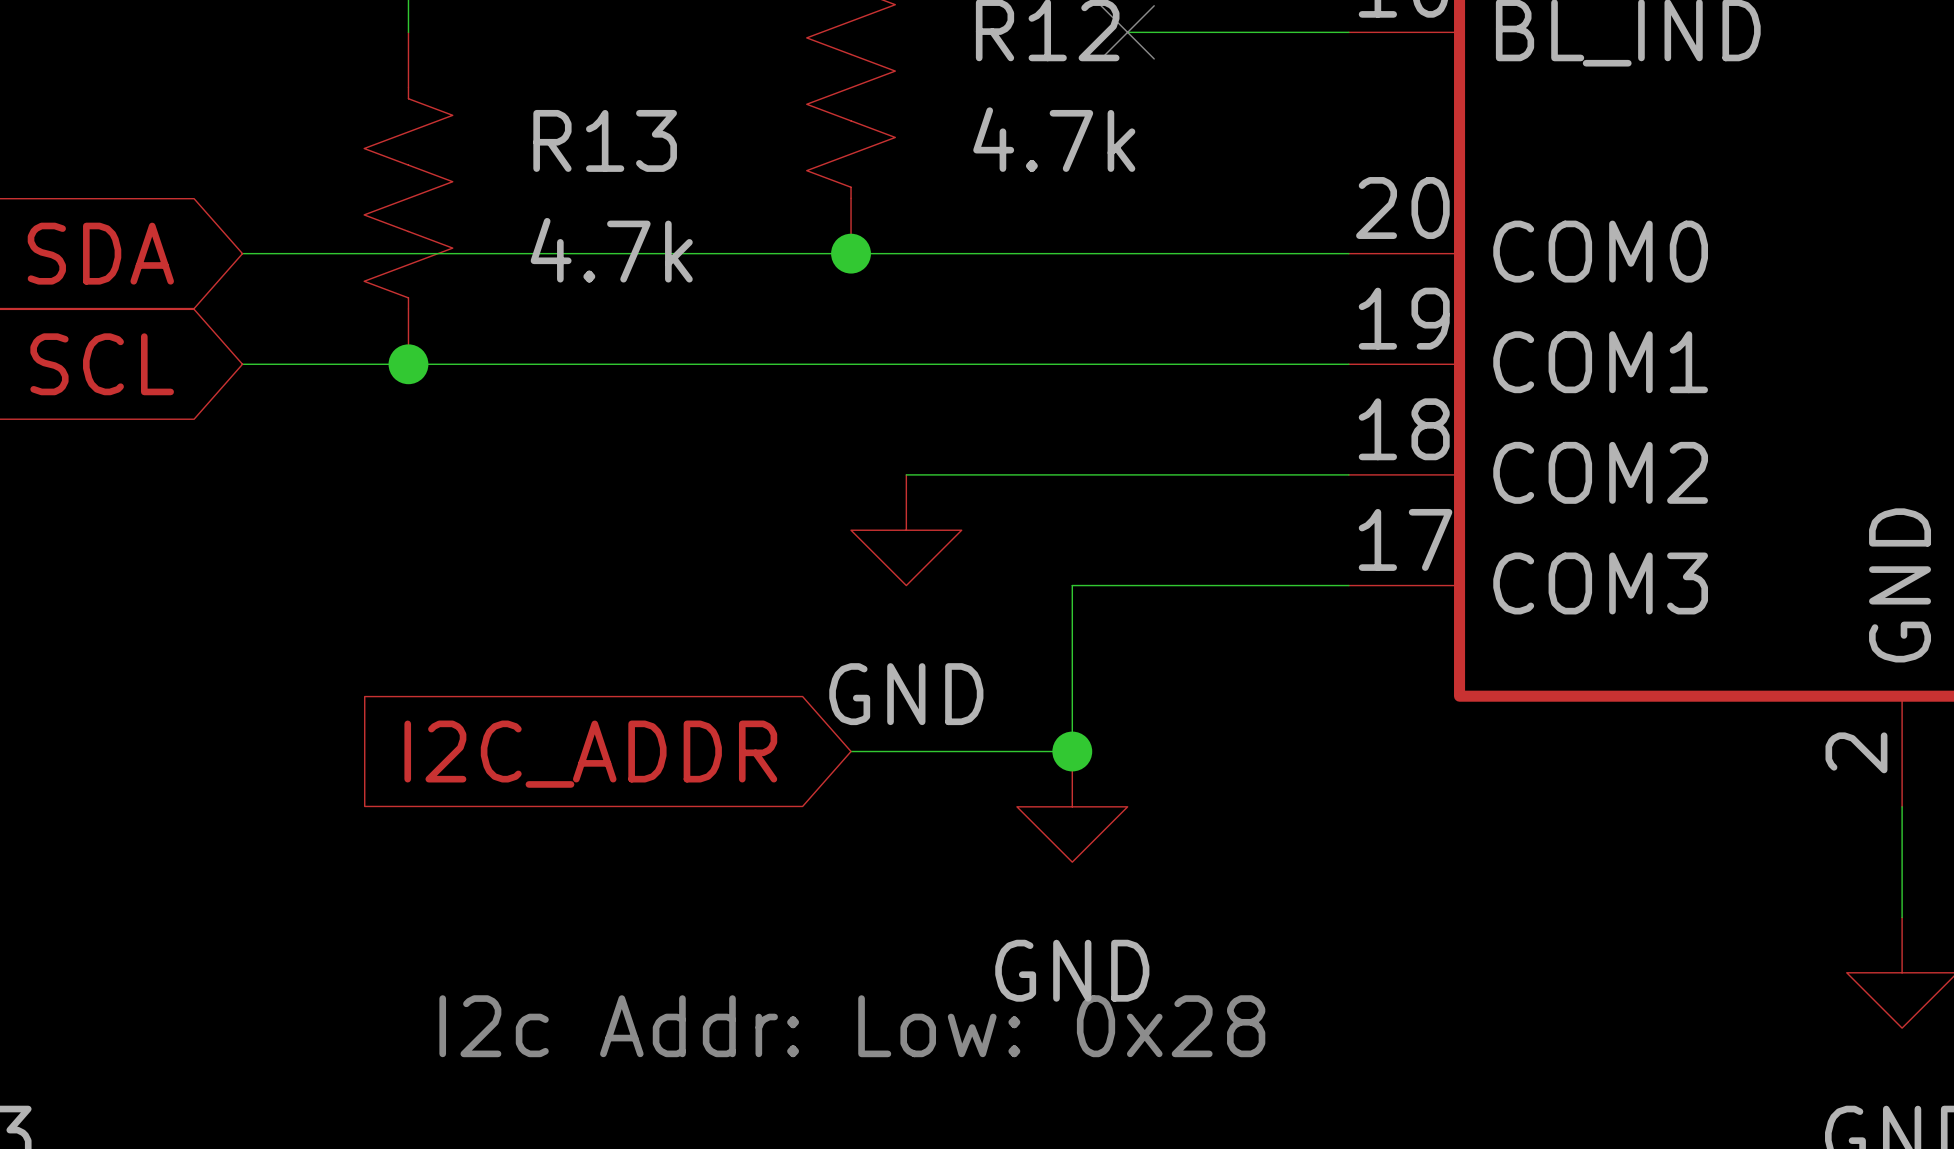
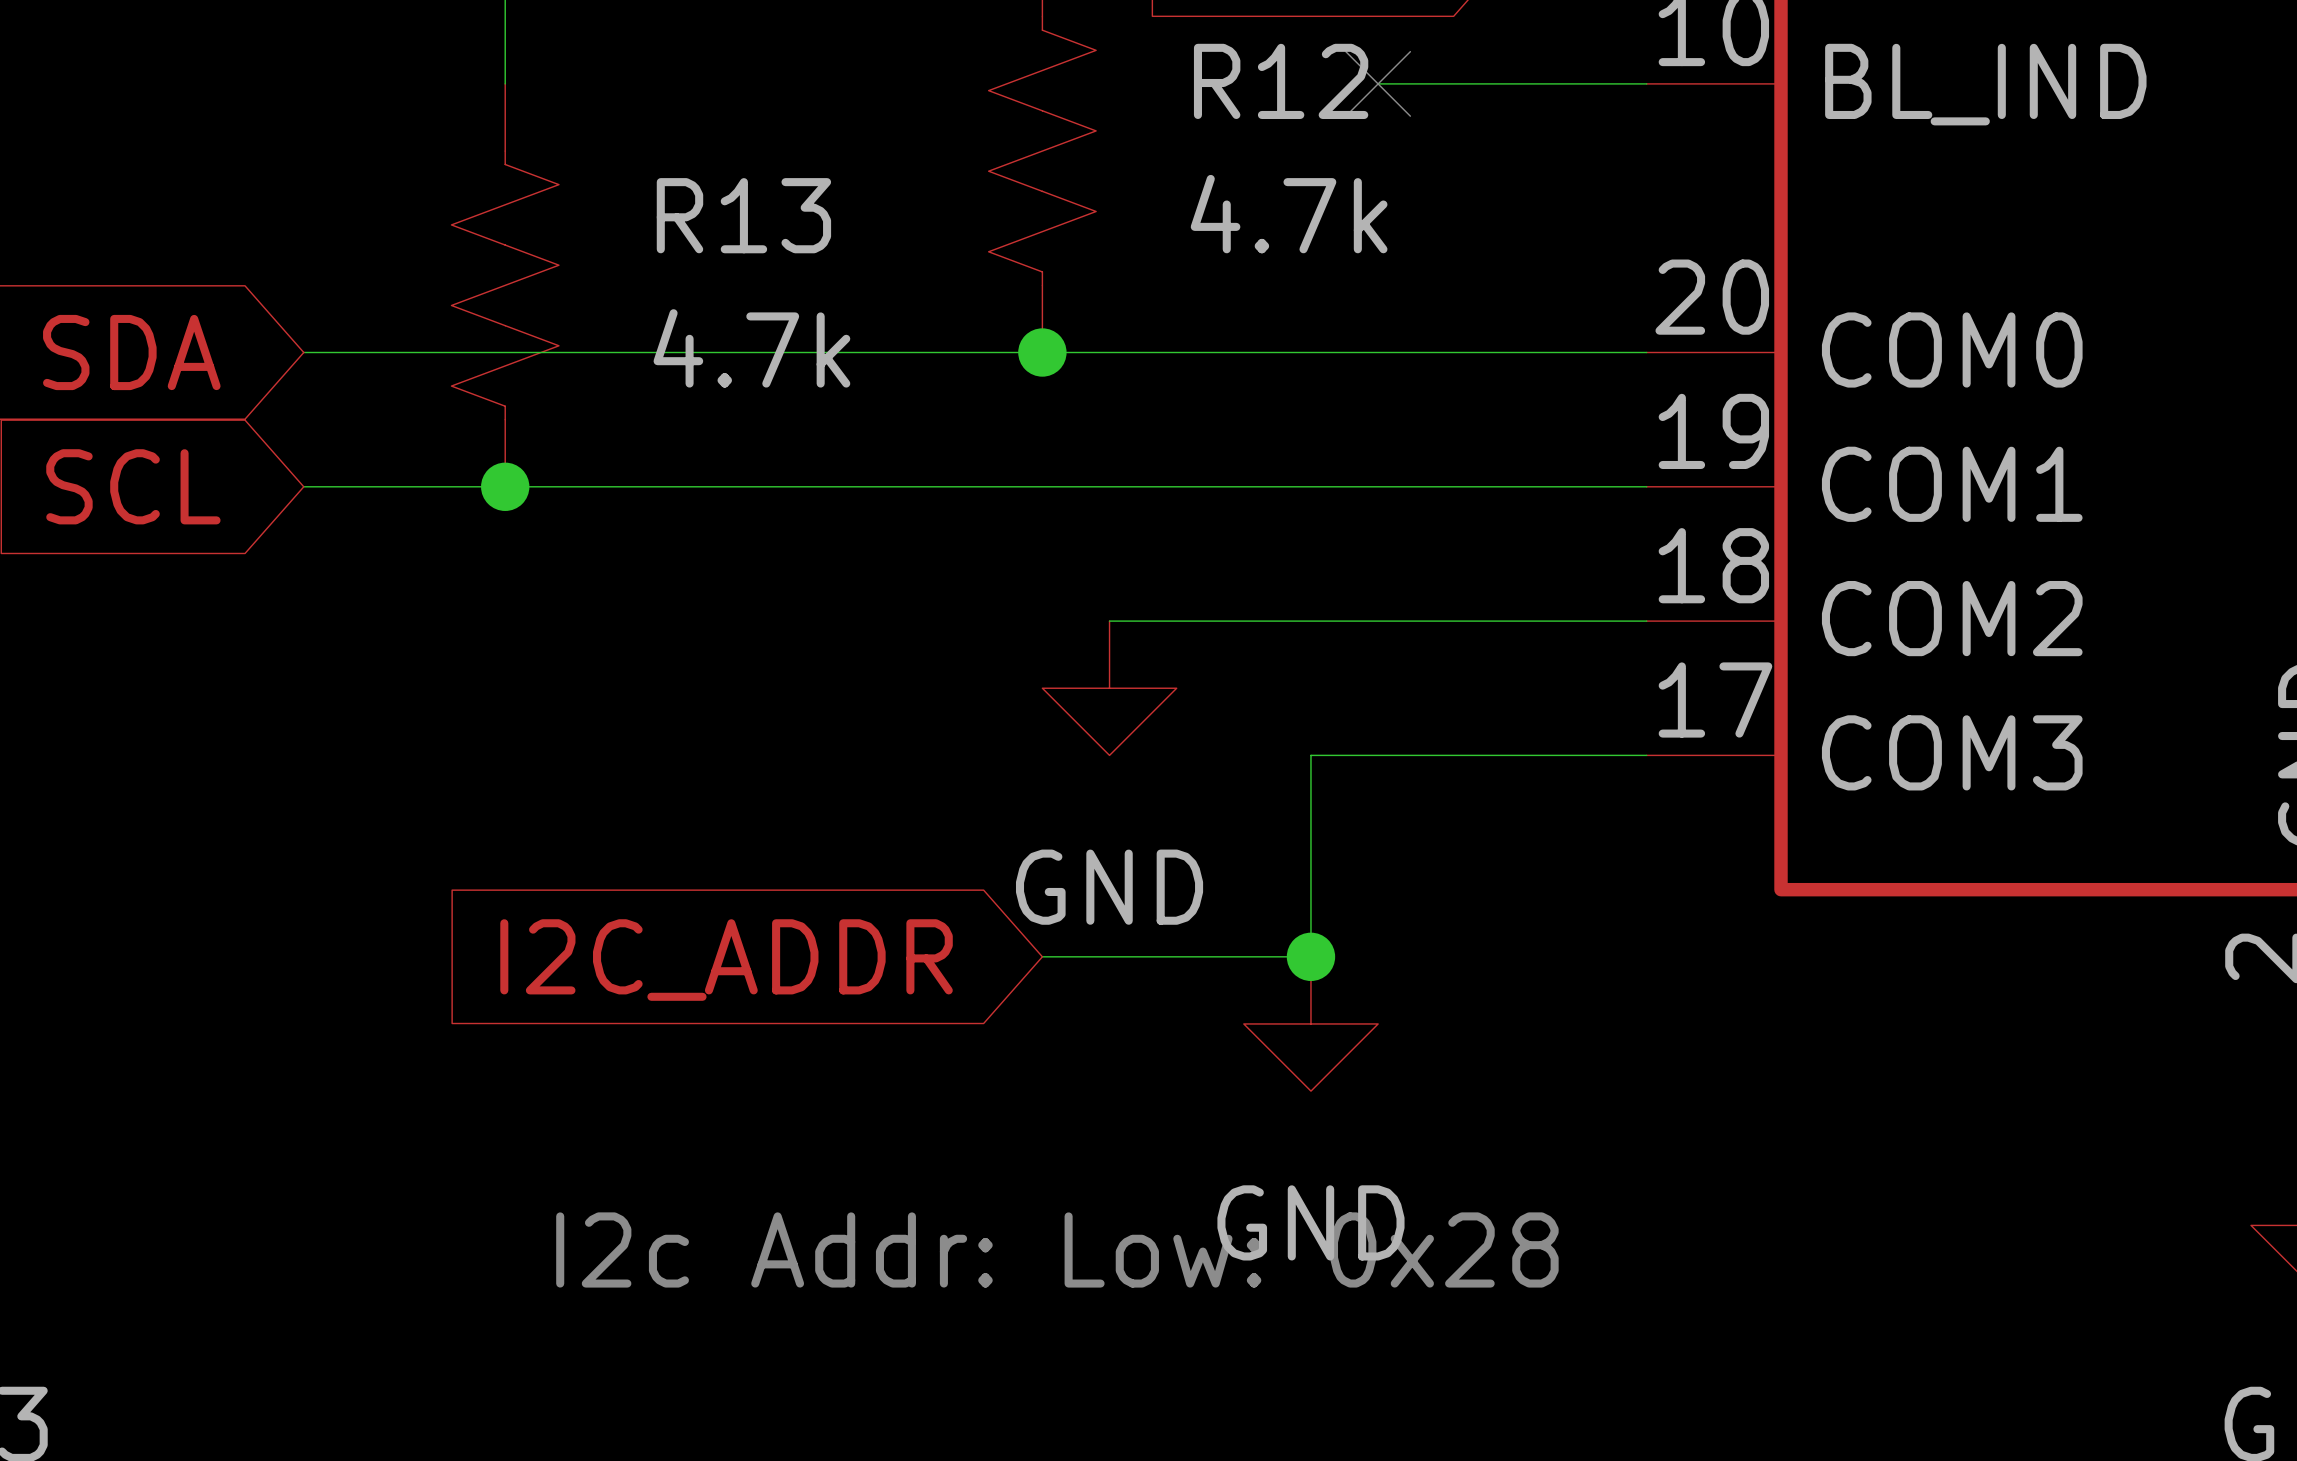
text position: I2c Addr: Low: 0x28 (852, 1026) -> I2c Addr: Low: 0x28 (1057, 1249)

